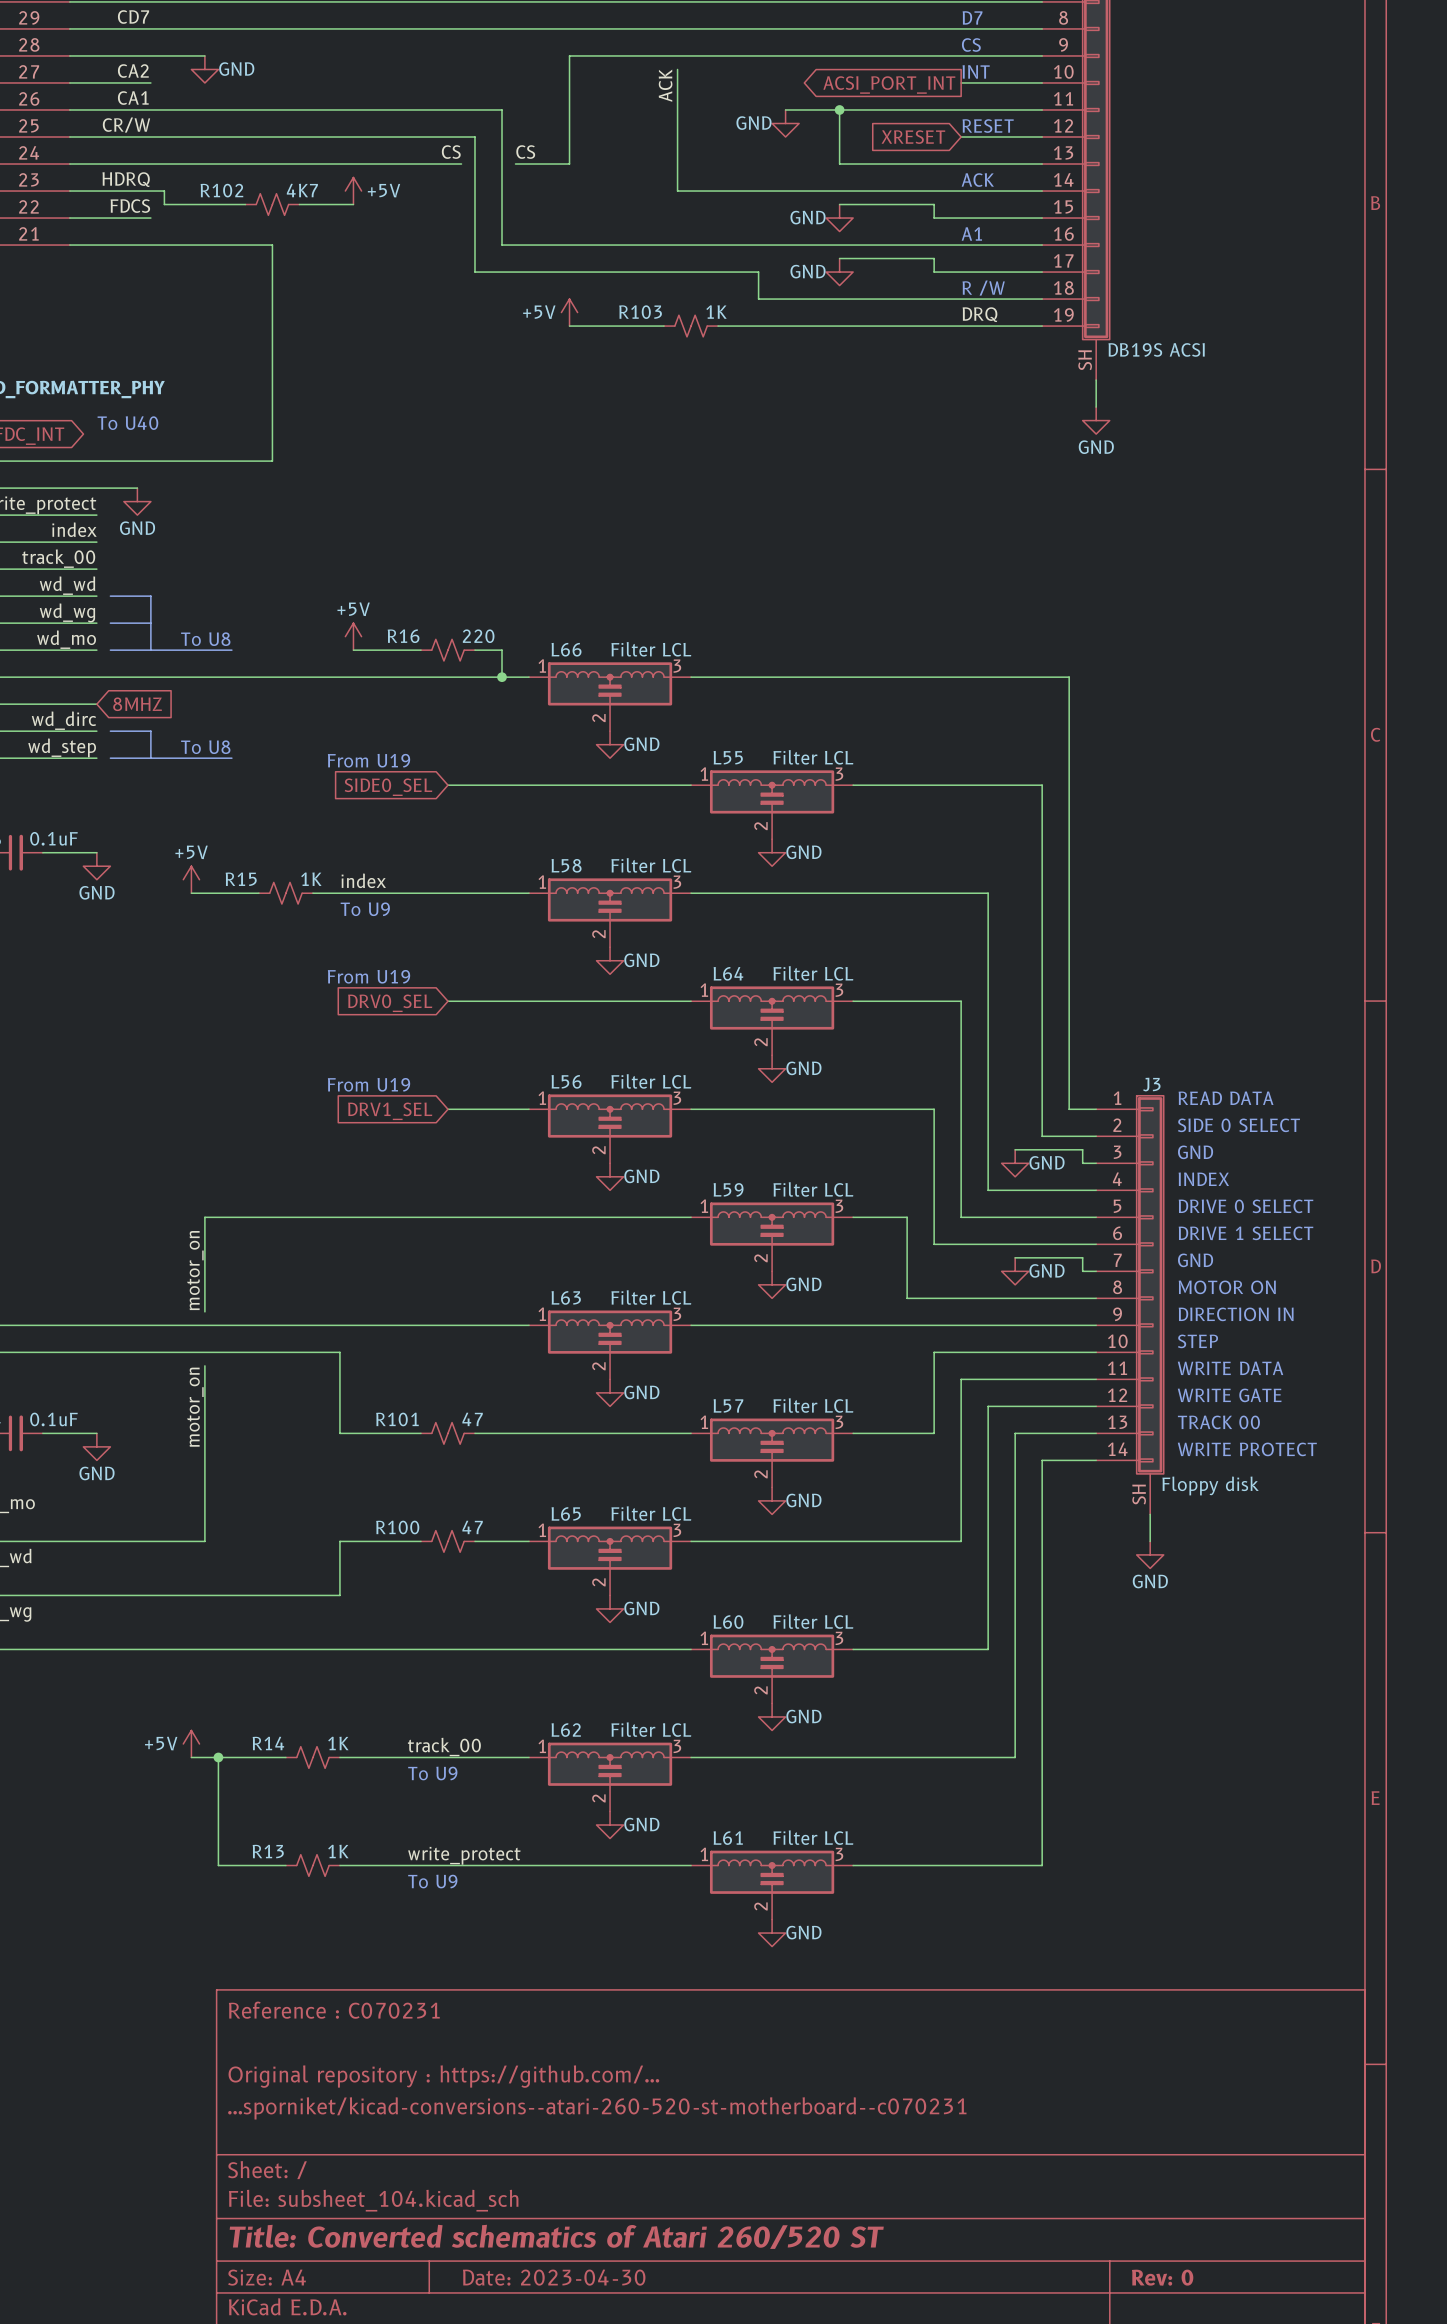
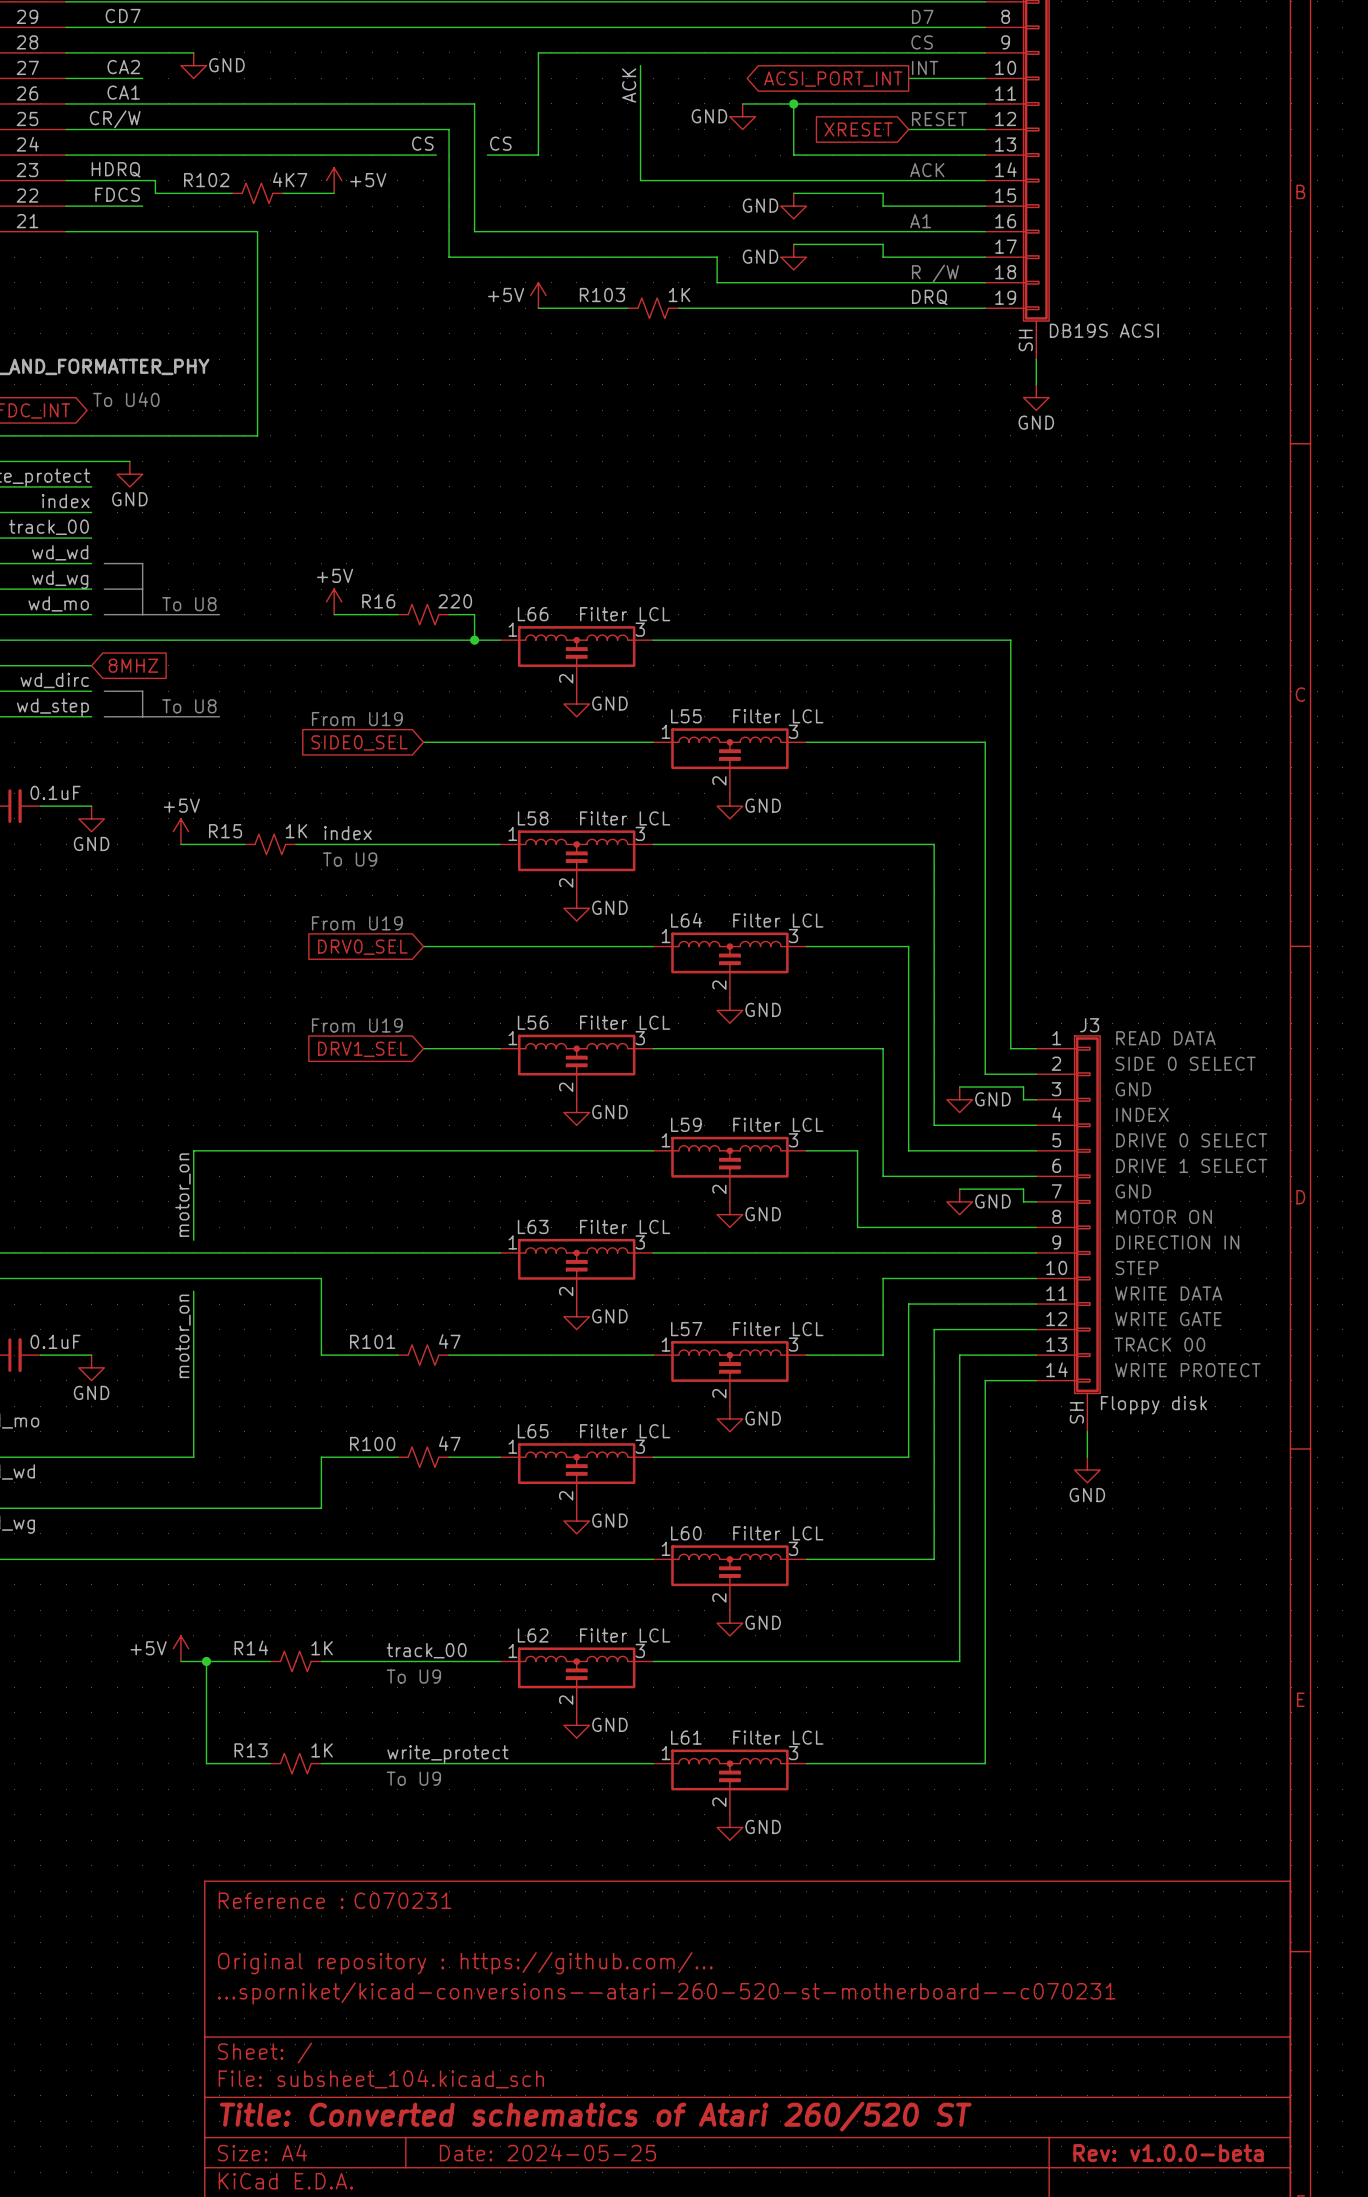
title block: Date: 2023-04-30 (554, 2277) -> Date: 2024-05-25 (547, 2152)
title block: Rev: 0 (1162, 2277) -> Rev: v1.0.0-beta (1168, 2153)

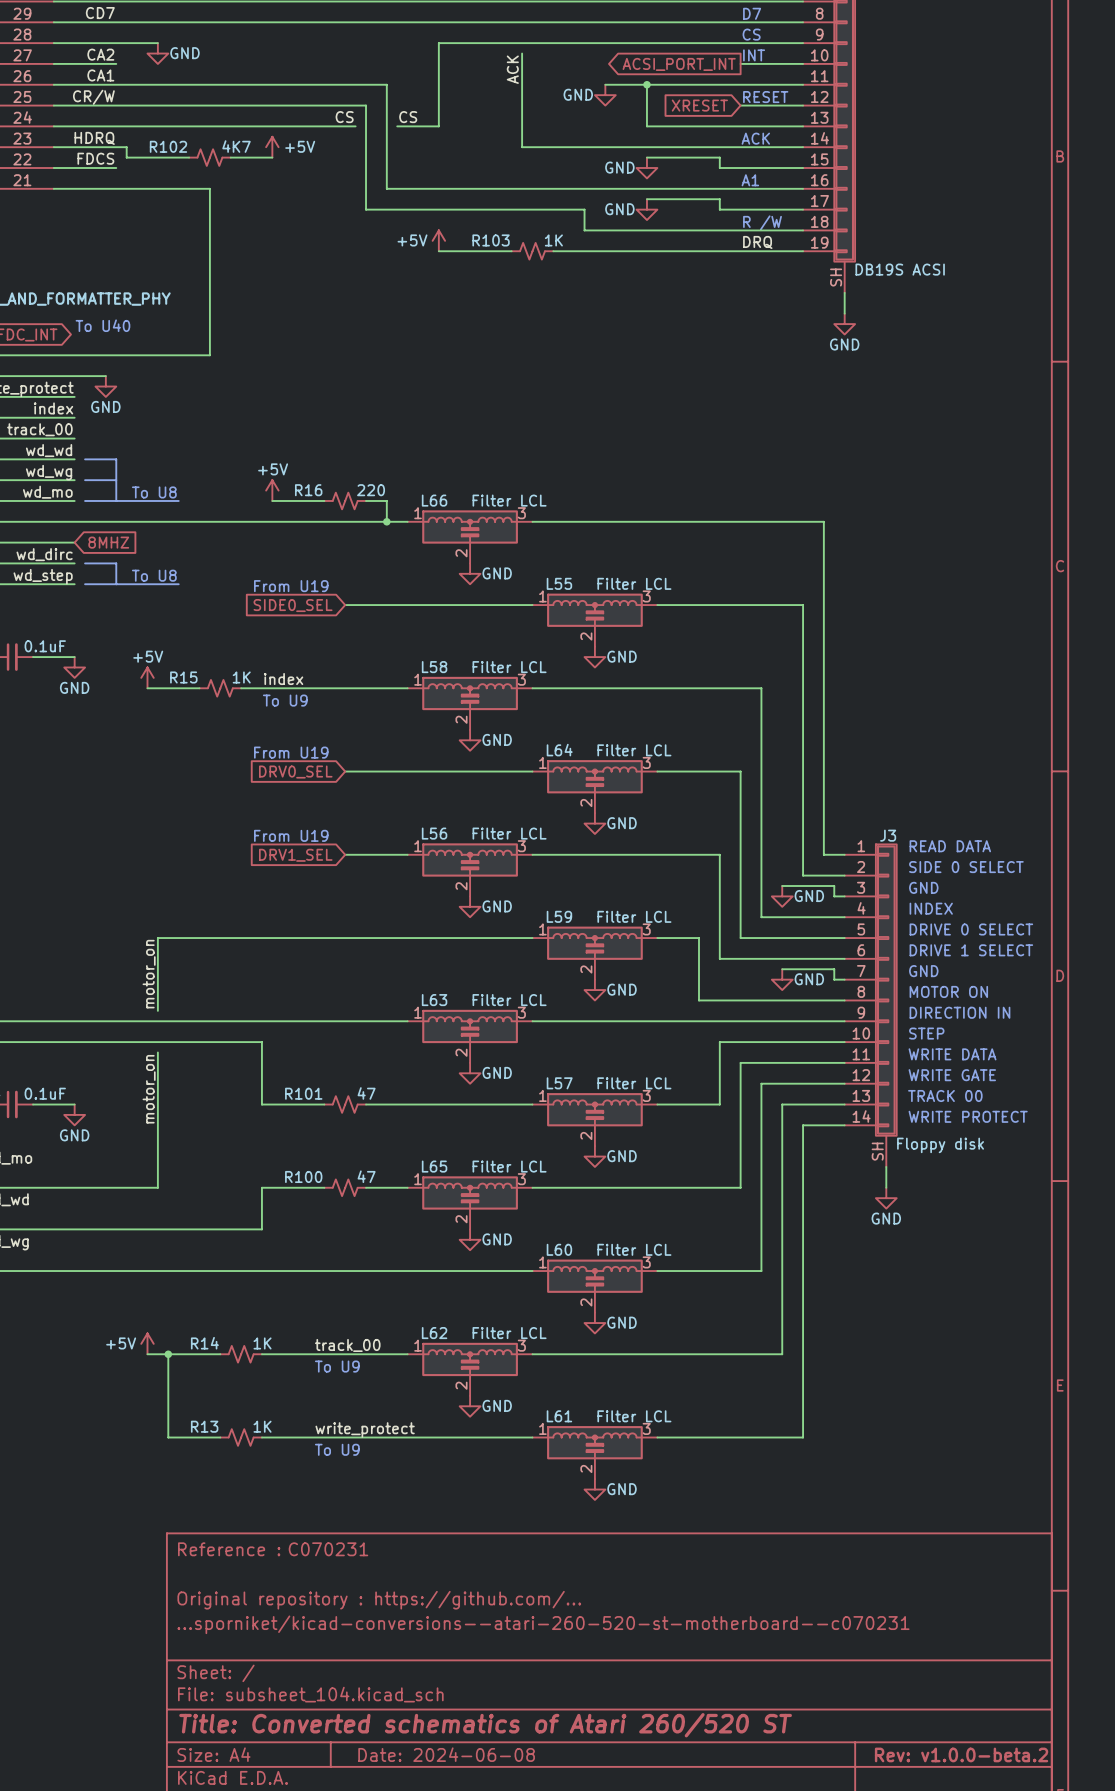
title block: Date: 2024-05-25 (547, 2152) -> Date: 2024-06-08 (446, 1754)
title block: Rev: v1.0.0-beta (1168, 2153) -> Rev: v1.0.0-beta.2 (961, 1754)

